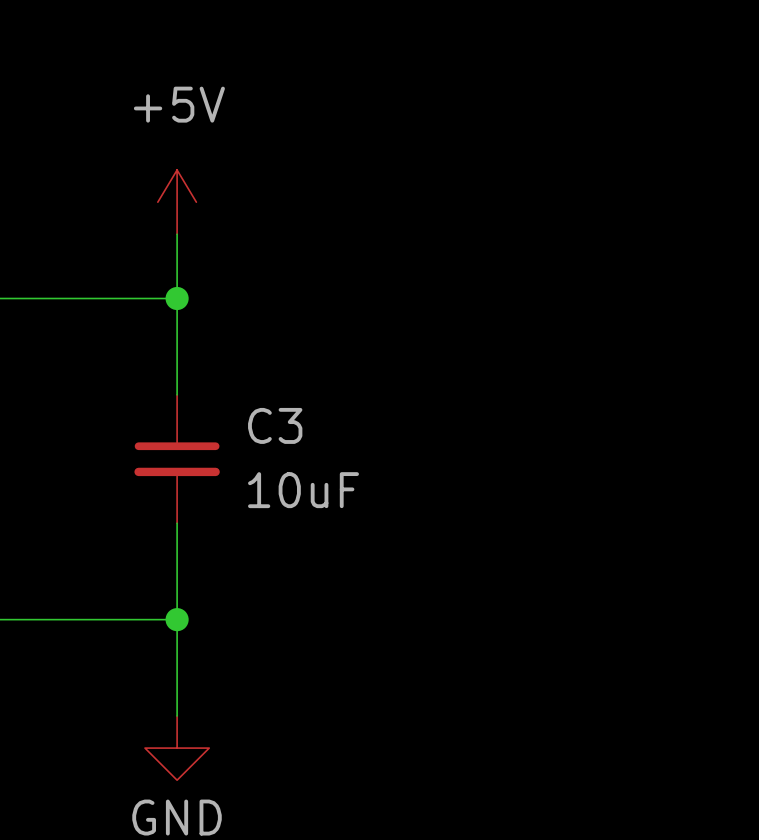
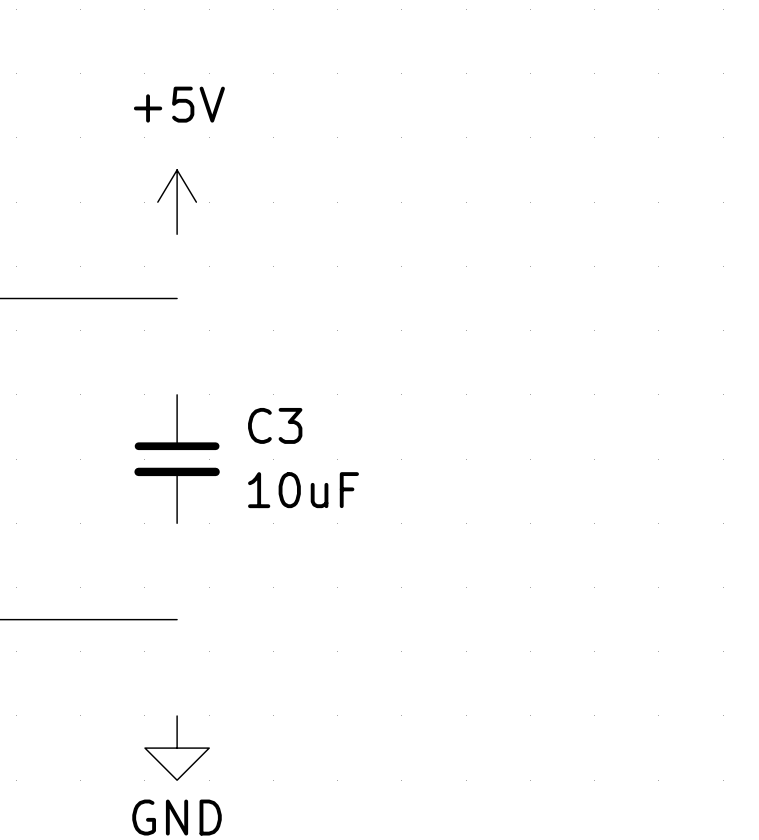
wire: (177, 234) (177, 394) -> none
junction: (177, 298) -> none
wire: (177, 523) (177, 715) -> none
junction: (177, 619) -> none

